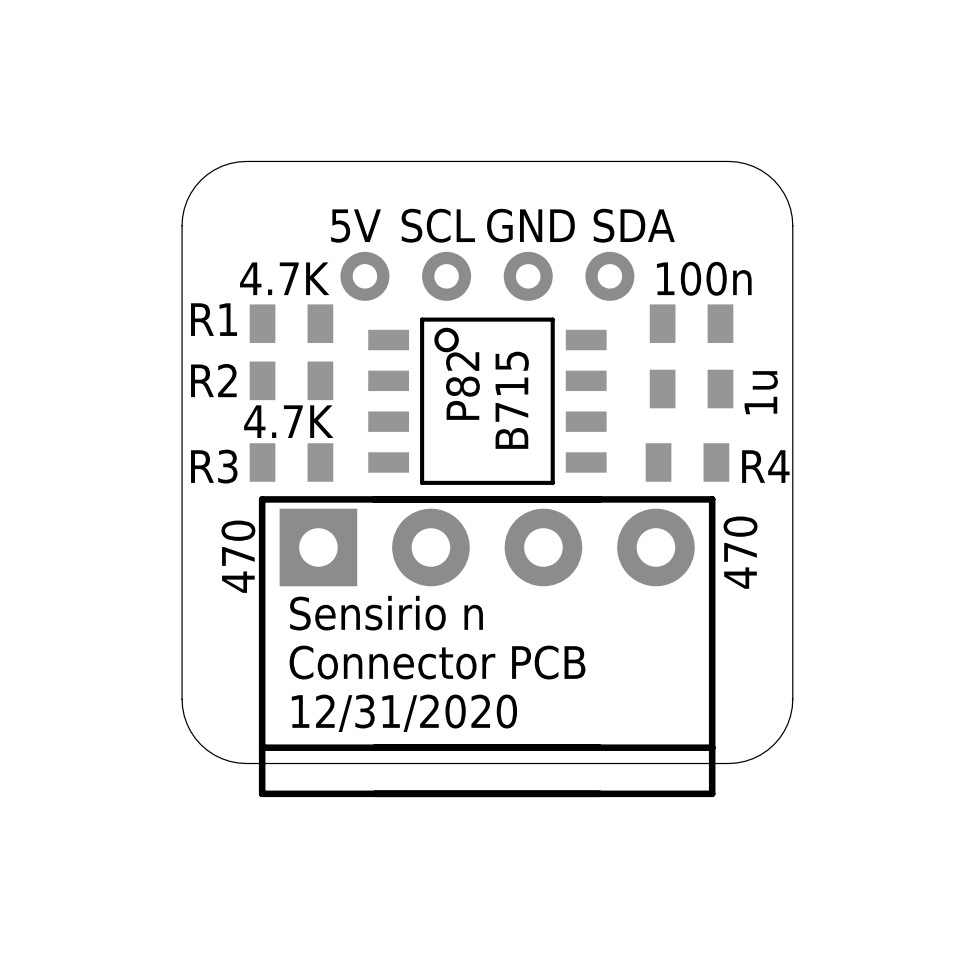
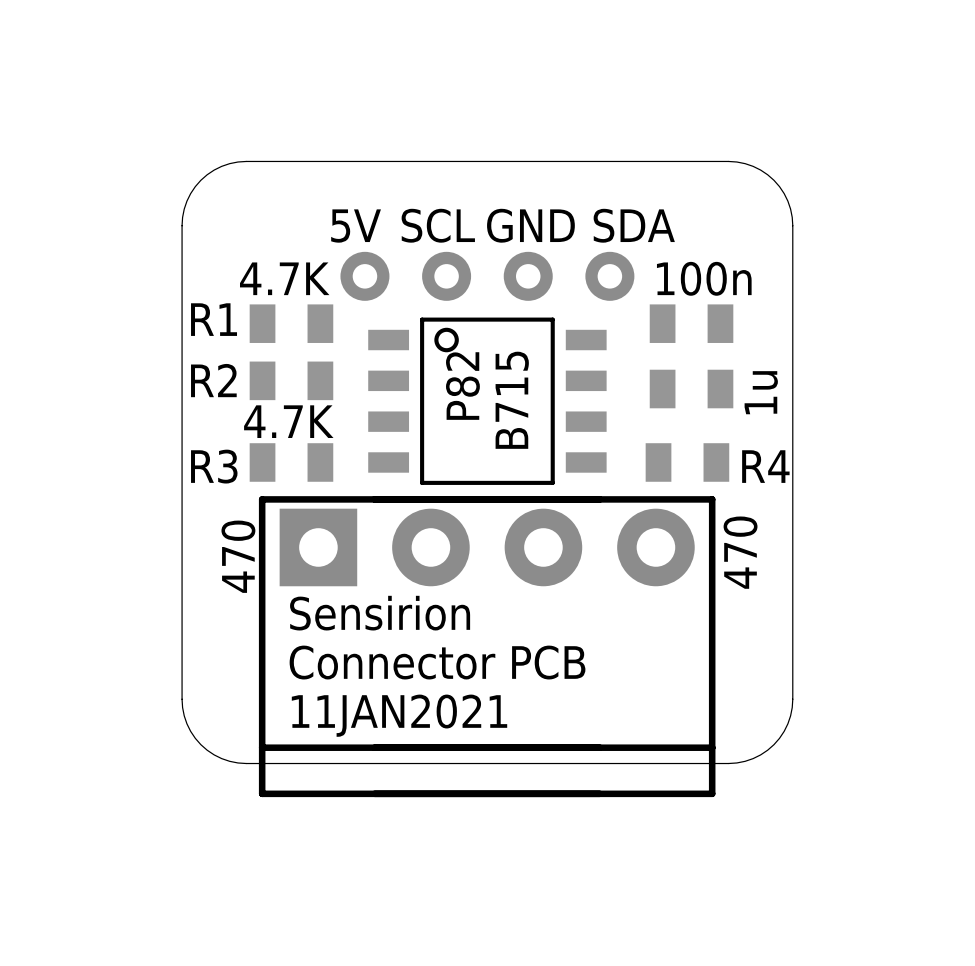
text: Sensirio n (386, 613) -> Sensirion (380, 613)
text: 12/31/2020 (404, 713) -> 11JAN2021 (399, 715)

